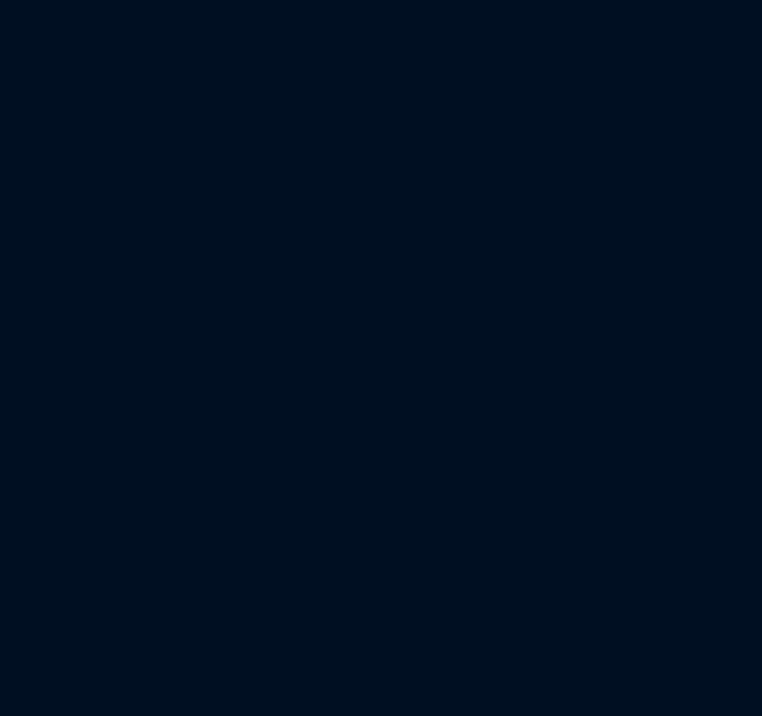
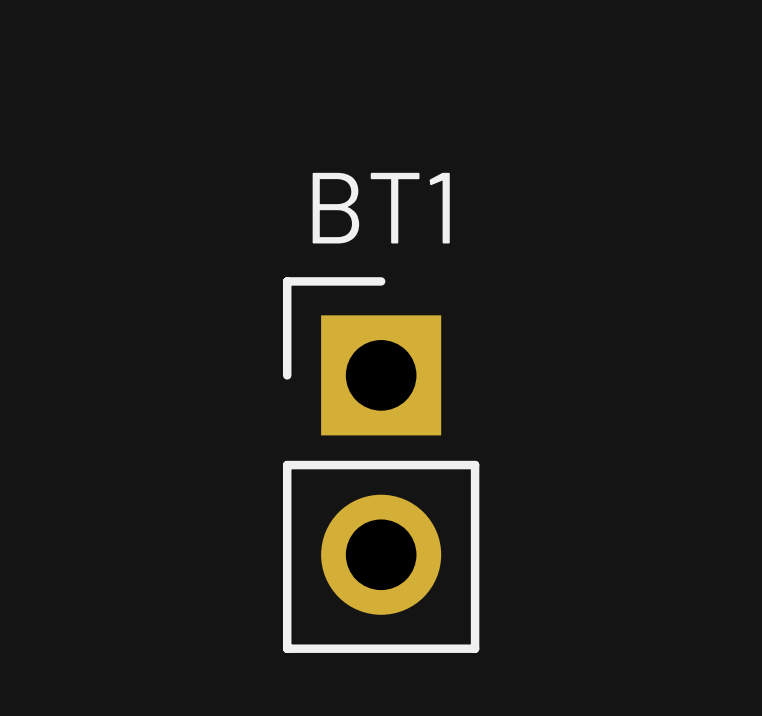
BT1: none -> (381, 465)

